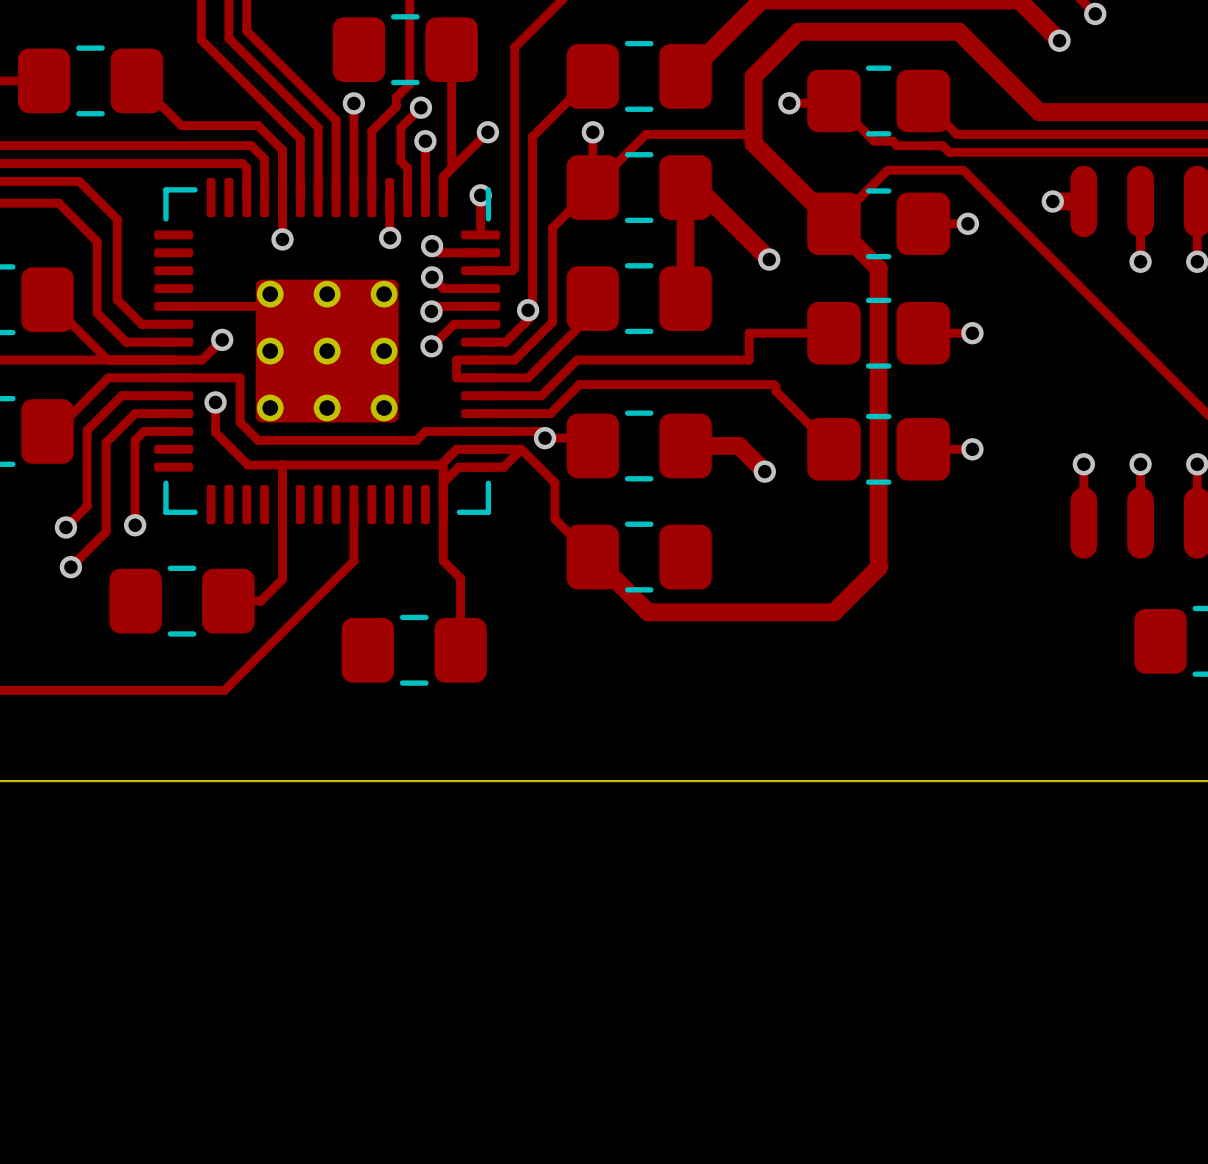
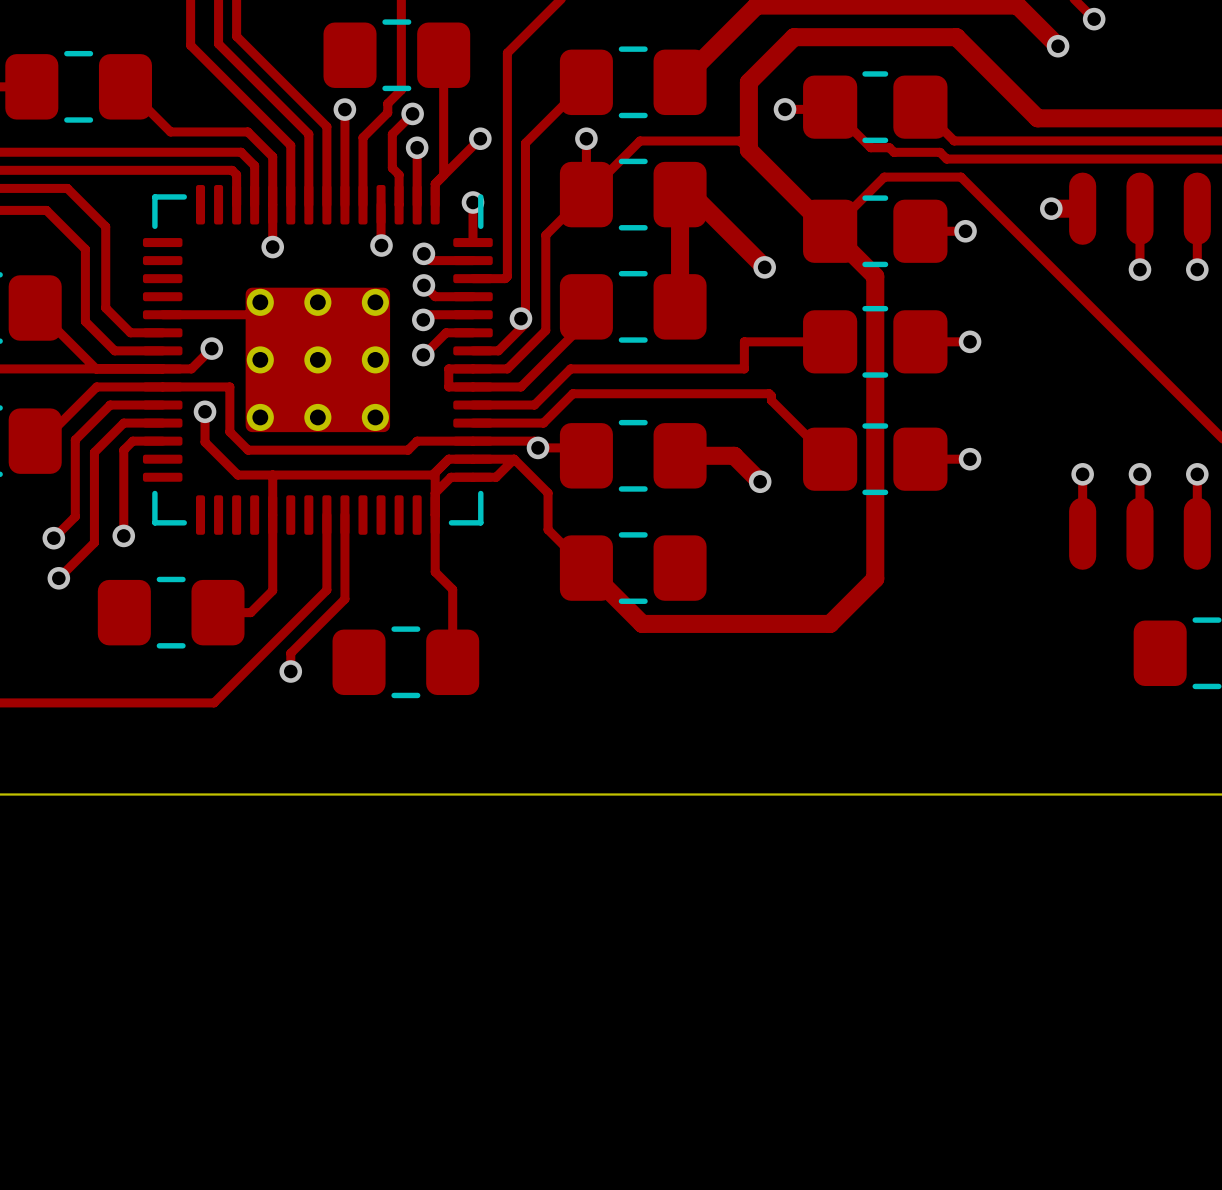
track: (353, 560) (336, 578) -> (326, 515) (326, 590)
track: none -> (344, 572) (344, 599) (290, 653) (290, 671)
via: none -> (290, 671)

